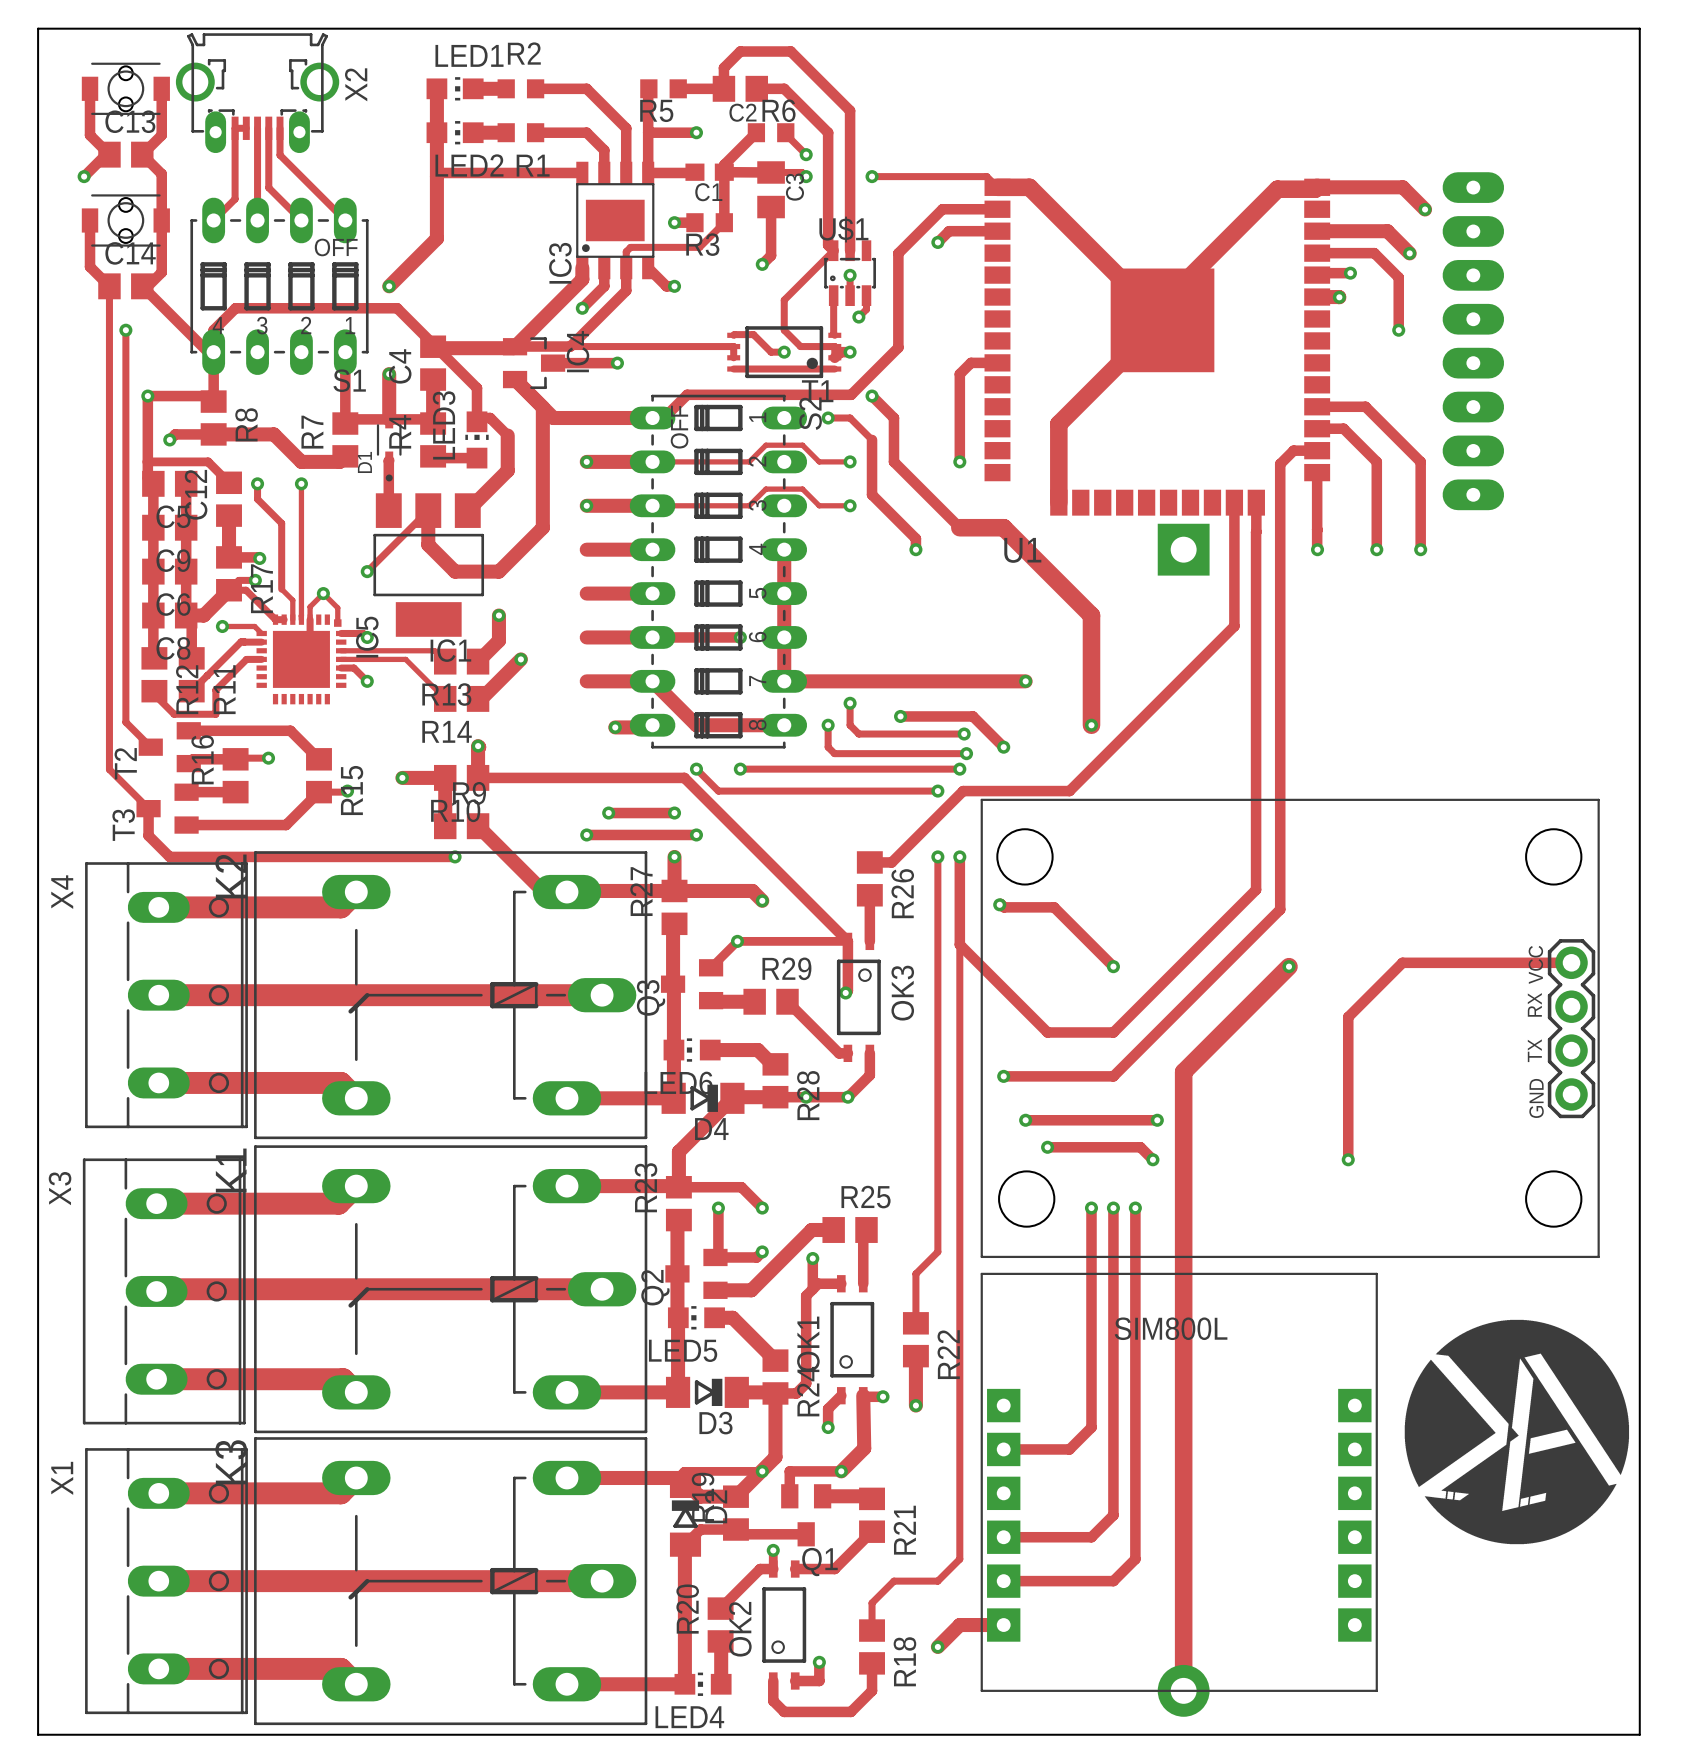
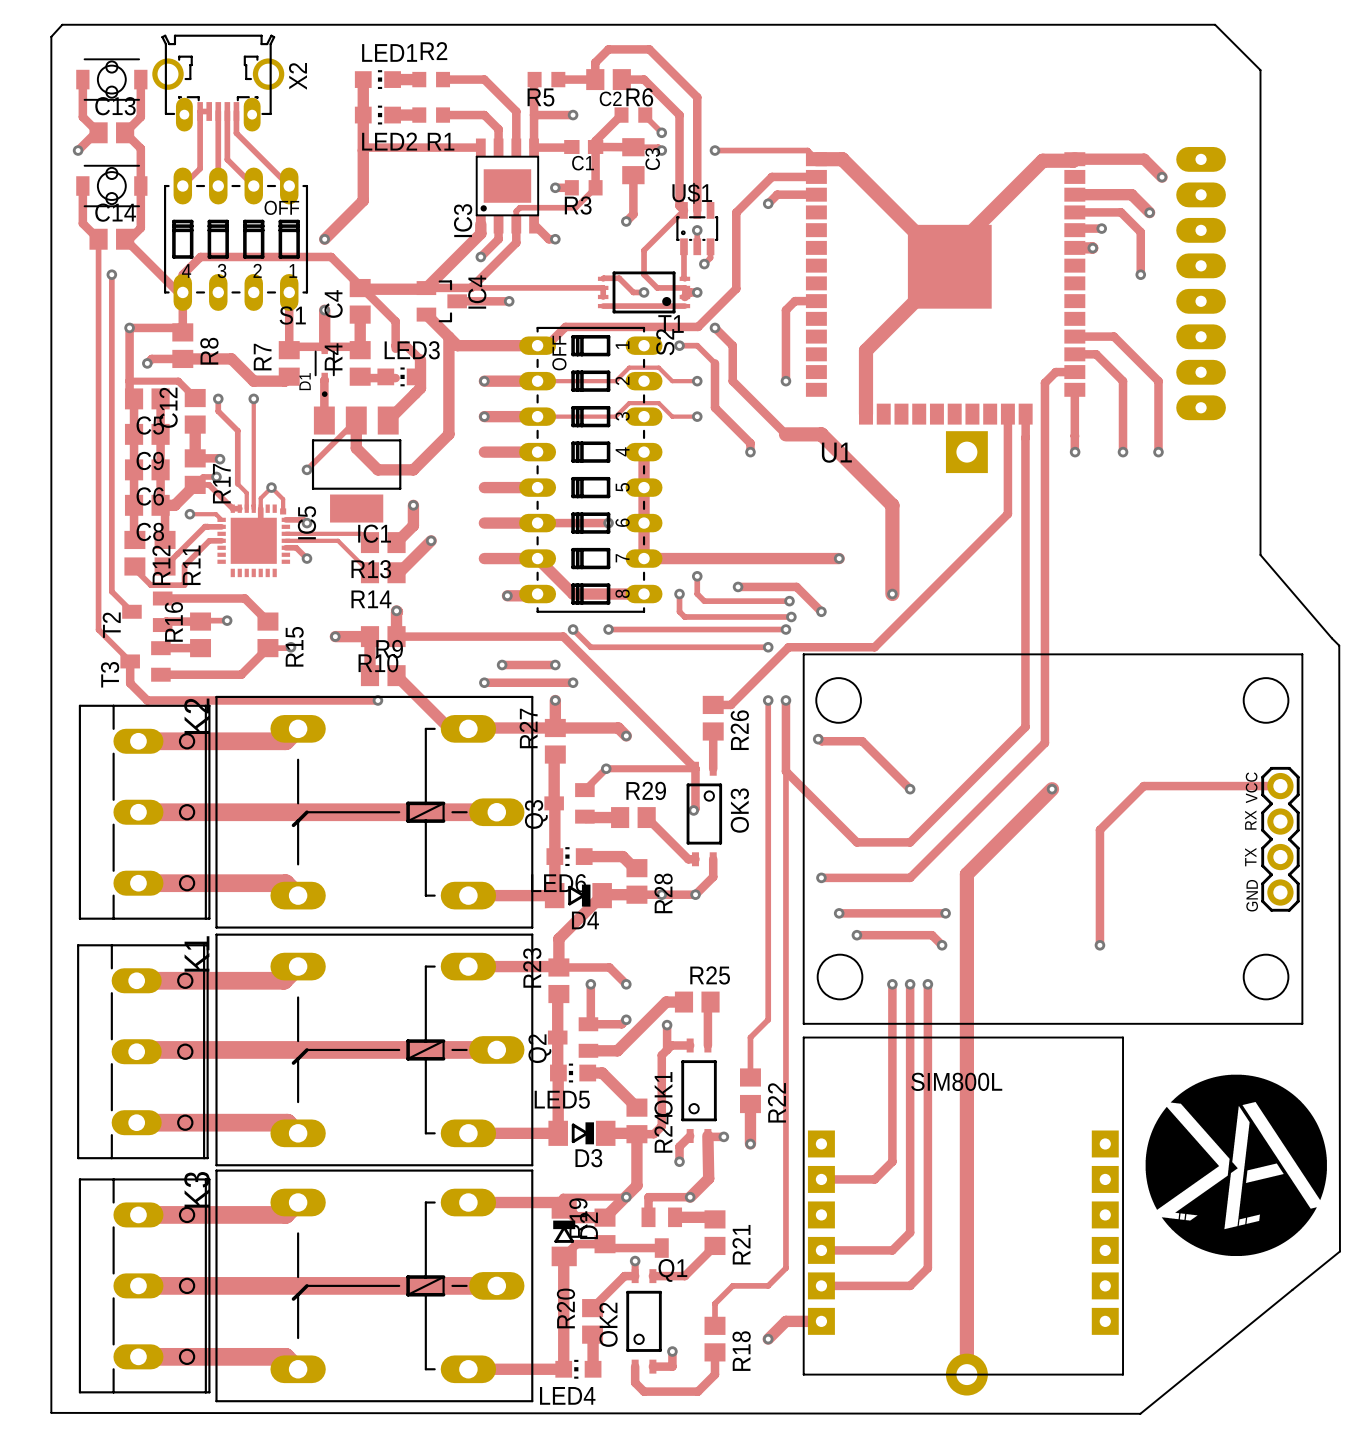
board edge: (38, 28) (1639, 28) (1639, 1734) (38, 1734) (38, 28) -> none
LED3 rotation: 0° (477, 439) -> 90° clockwise (400, 376)
X4 name: X4 (62, 892) -> none
X3 name: X3 (60, 1188) -> none
X1 name: X1 (62, 1478) -> none
board edge: none -> (51, 1412) (51, 36) (62, 24) (1215, 24) (1260, 70) (1260, 555) (1339, 645) (1339, 1251) (1140, 1413) (51, 1412)

